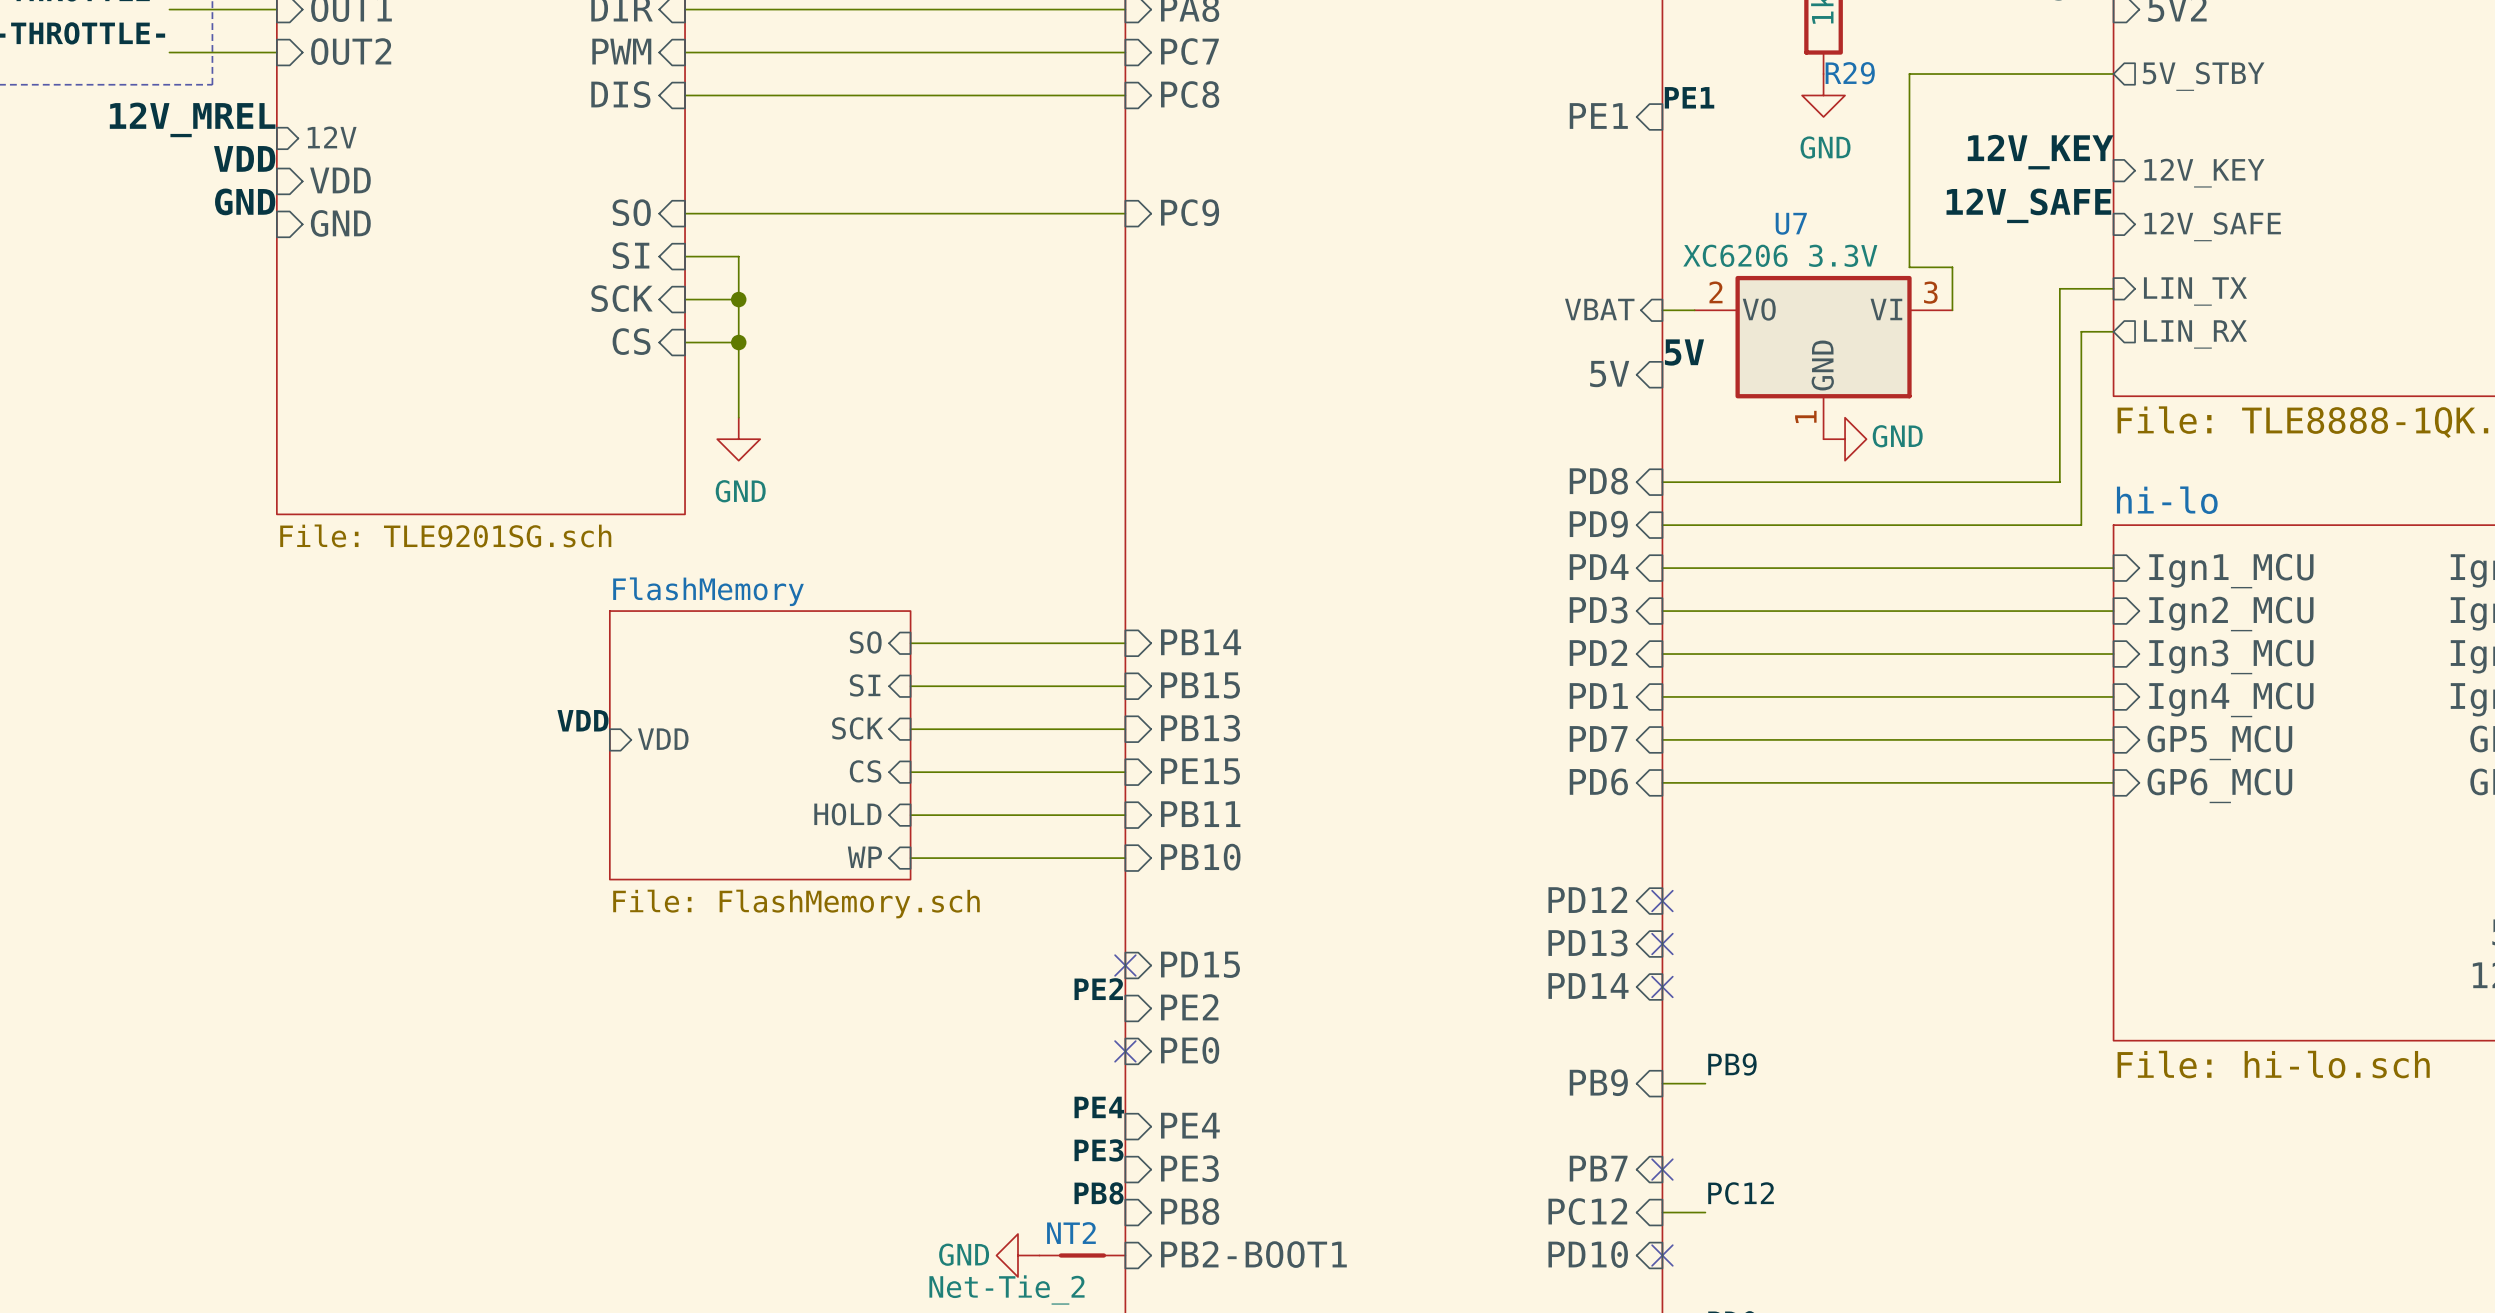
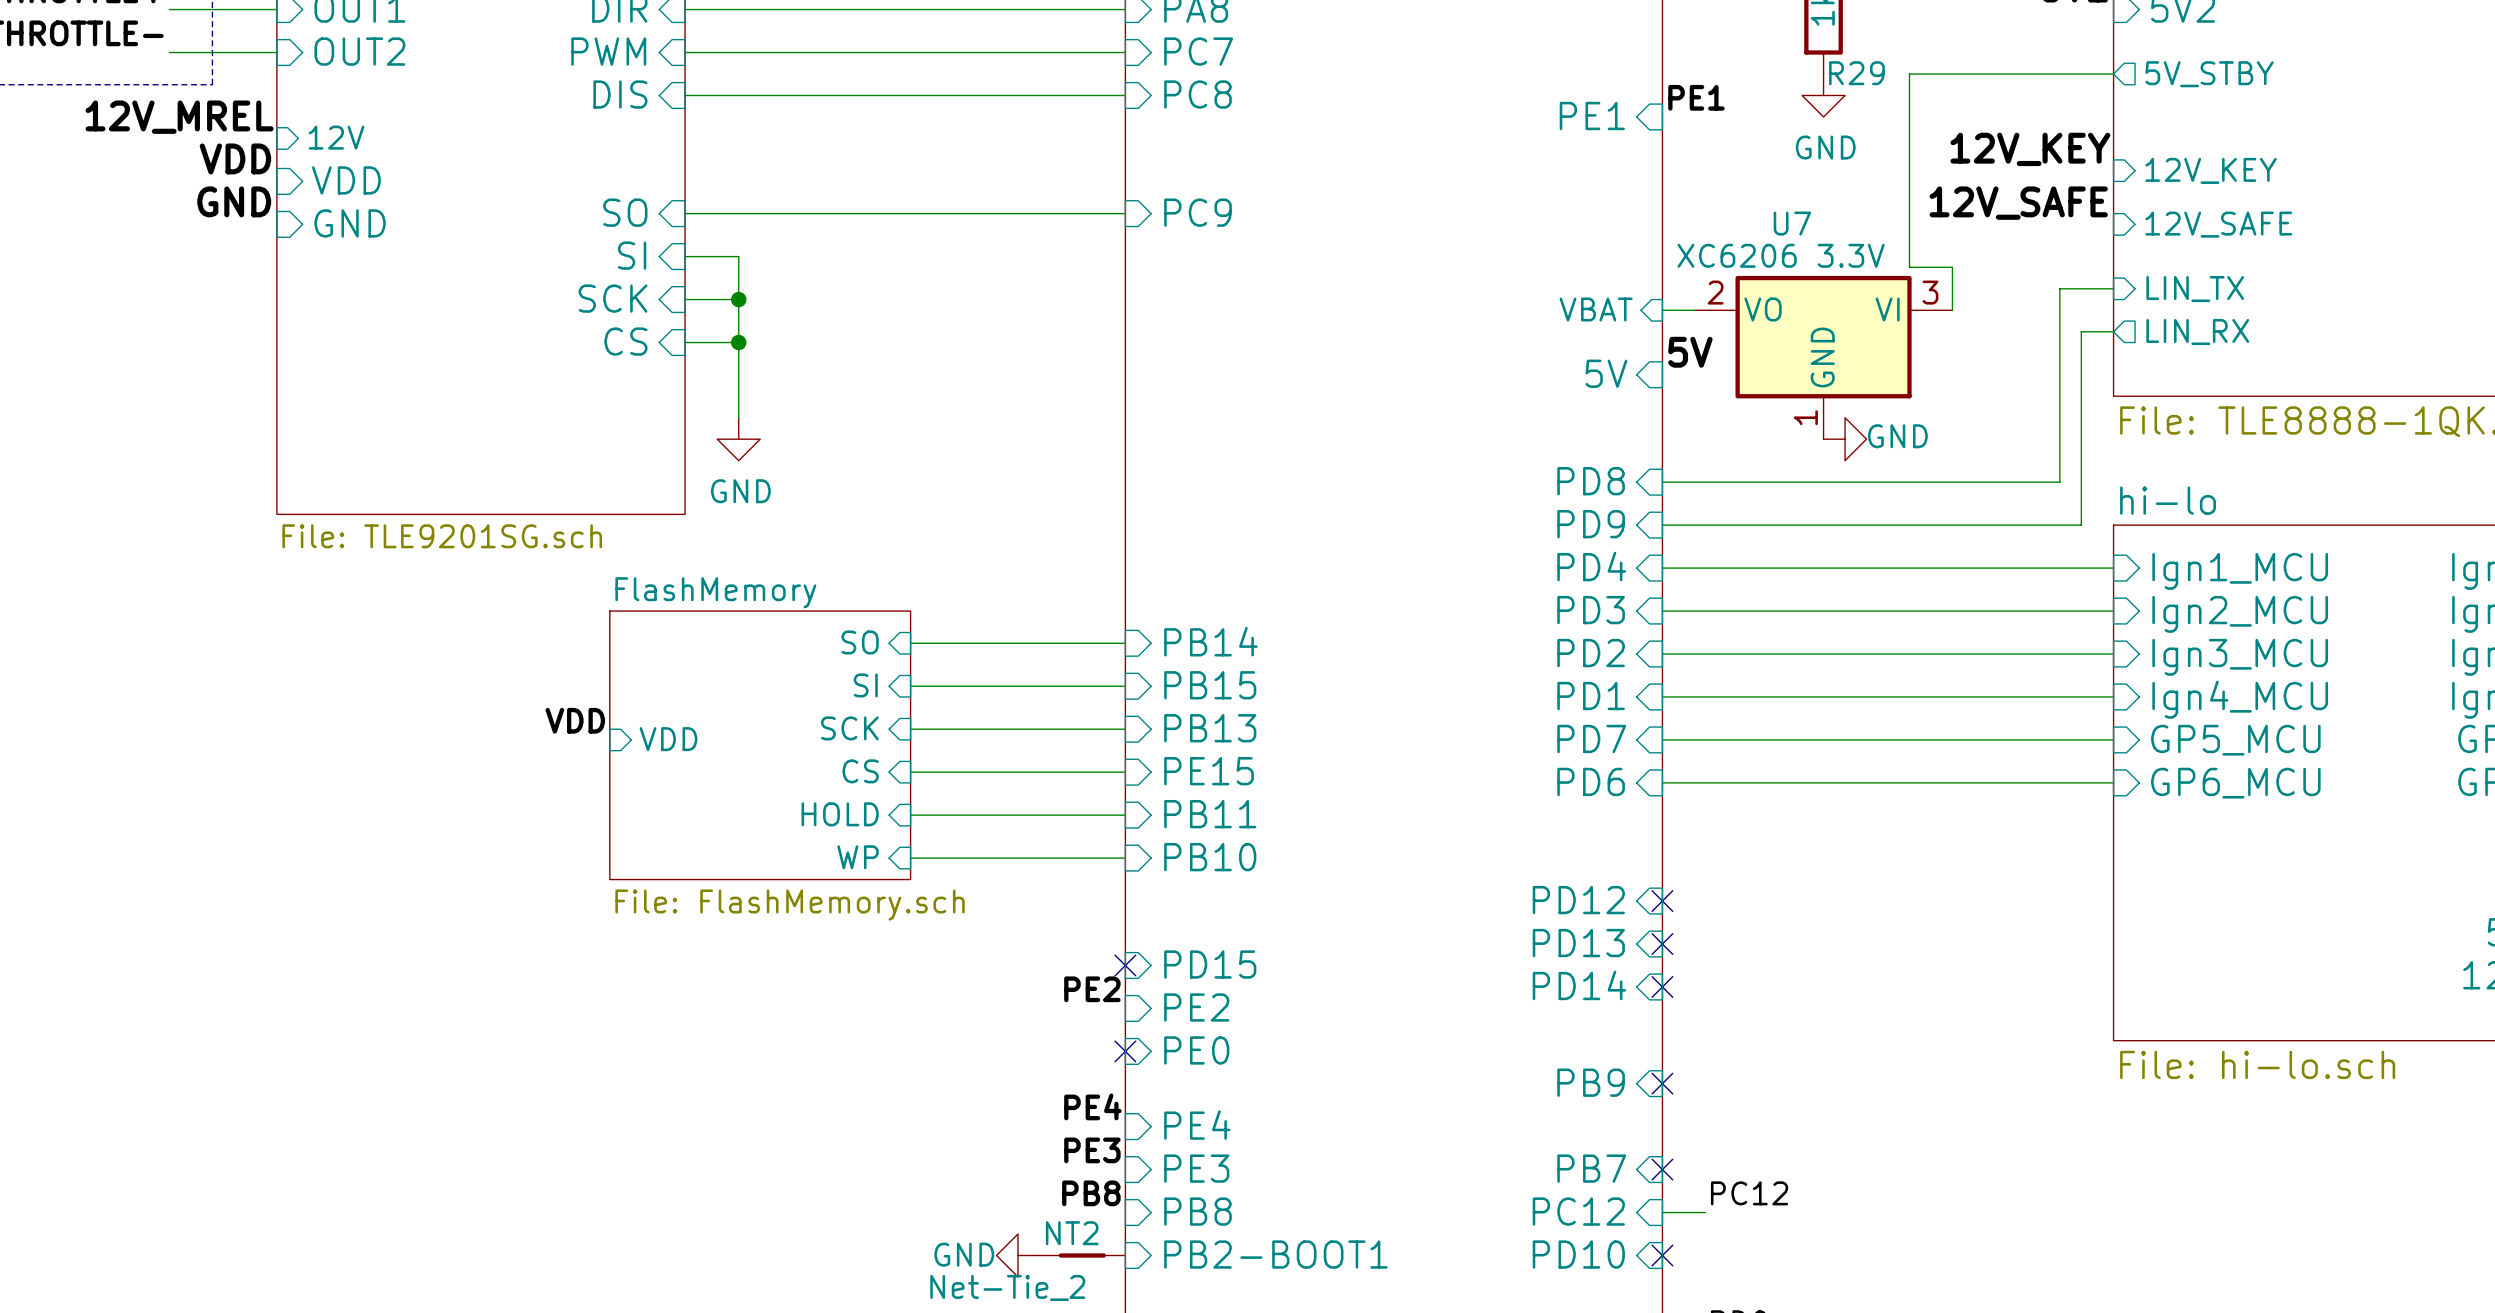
label: PB9 (1732, 1064) -> none
wire: (1662, 1083) (1705, 1083) -> none
no-connect mark: none -> (1662, 1083)

